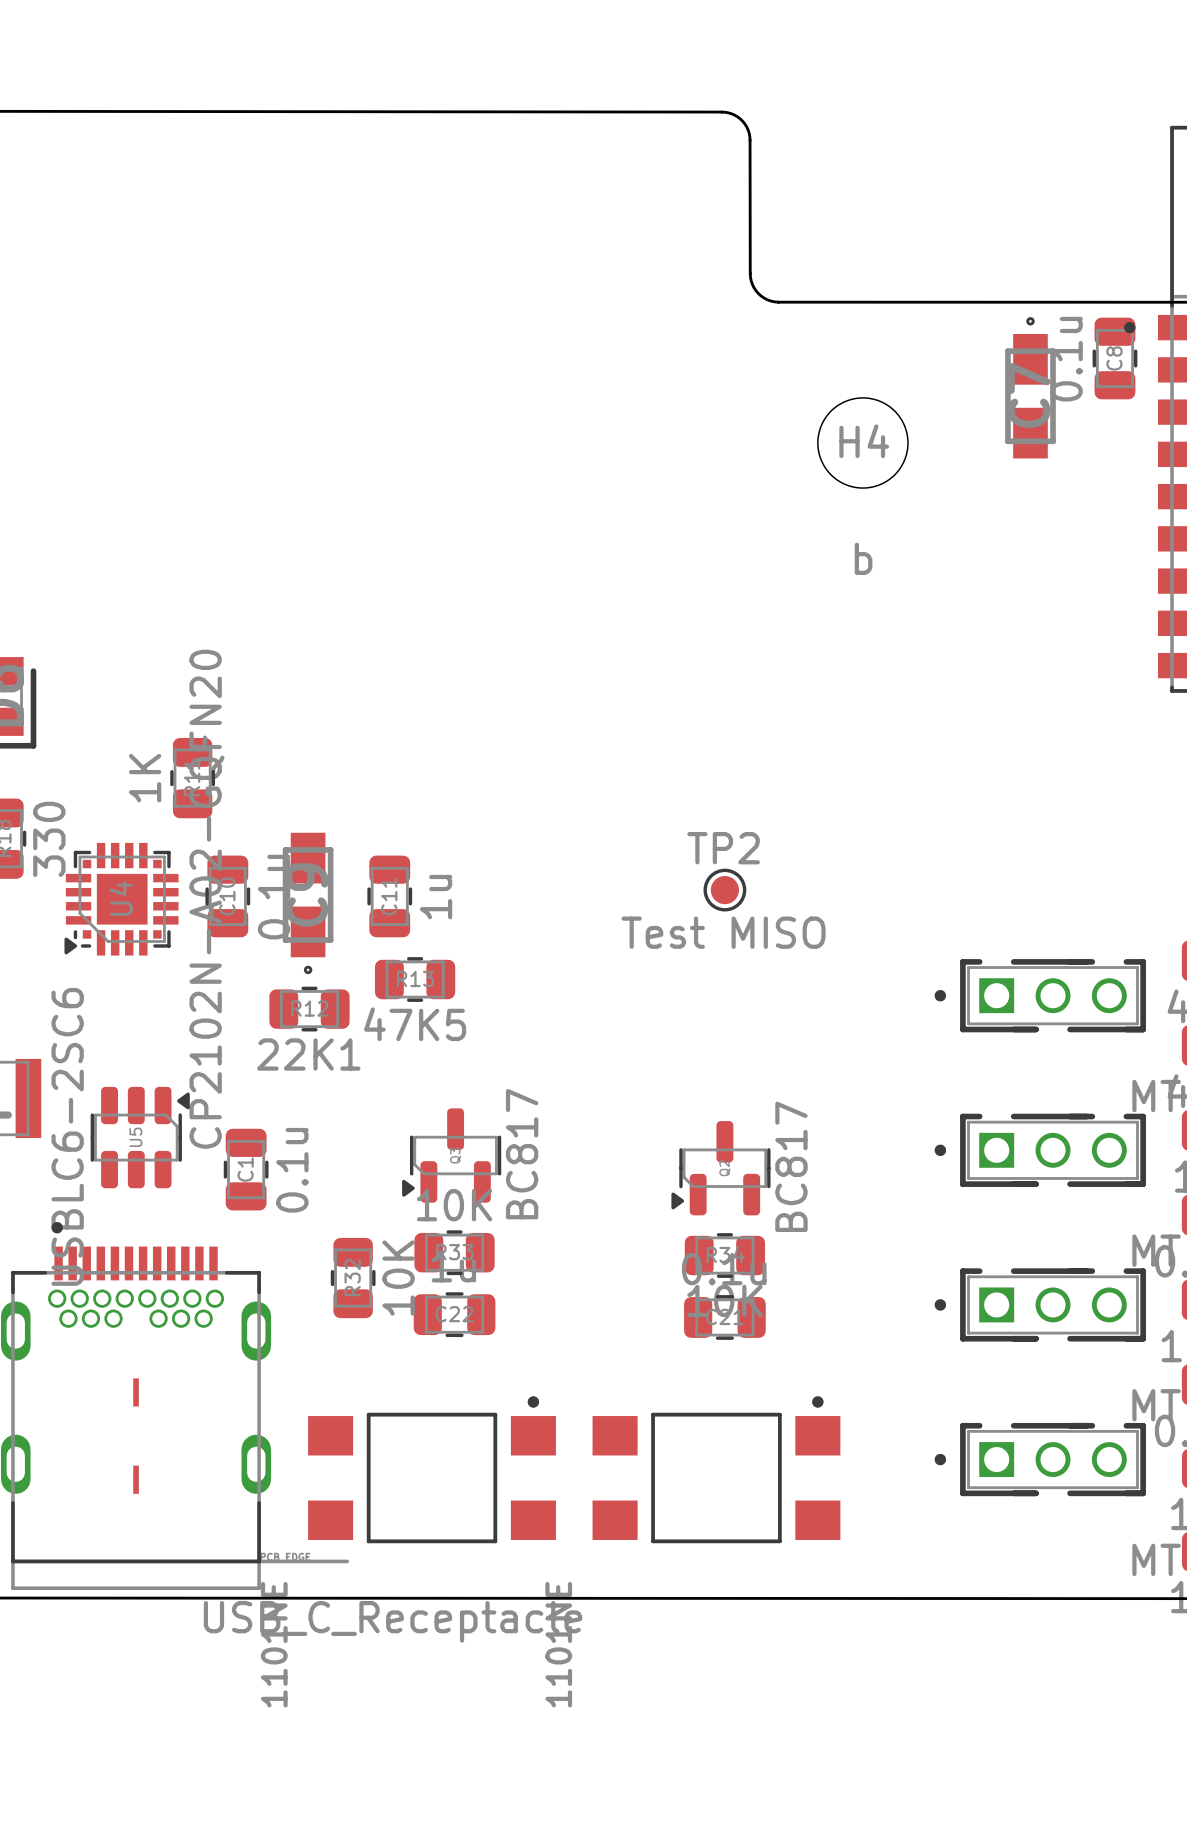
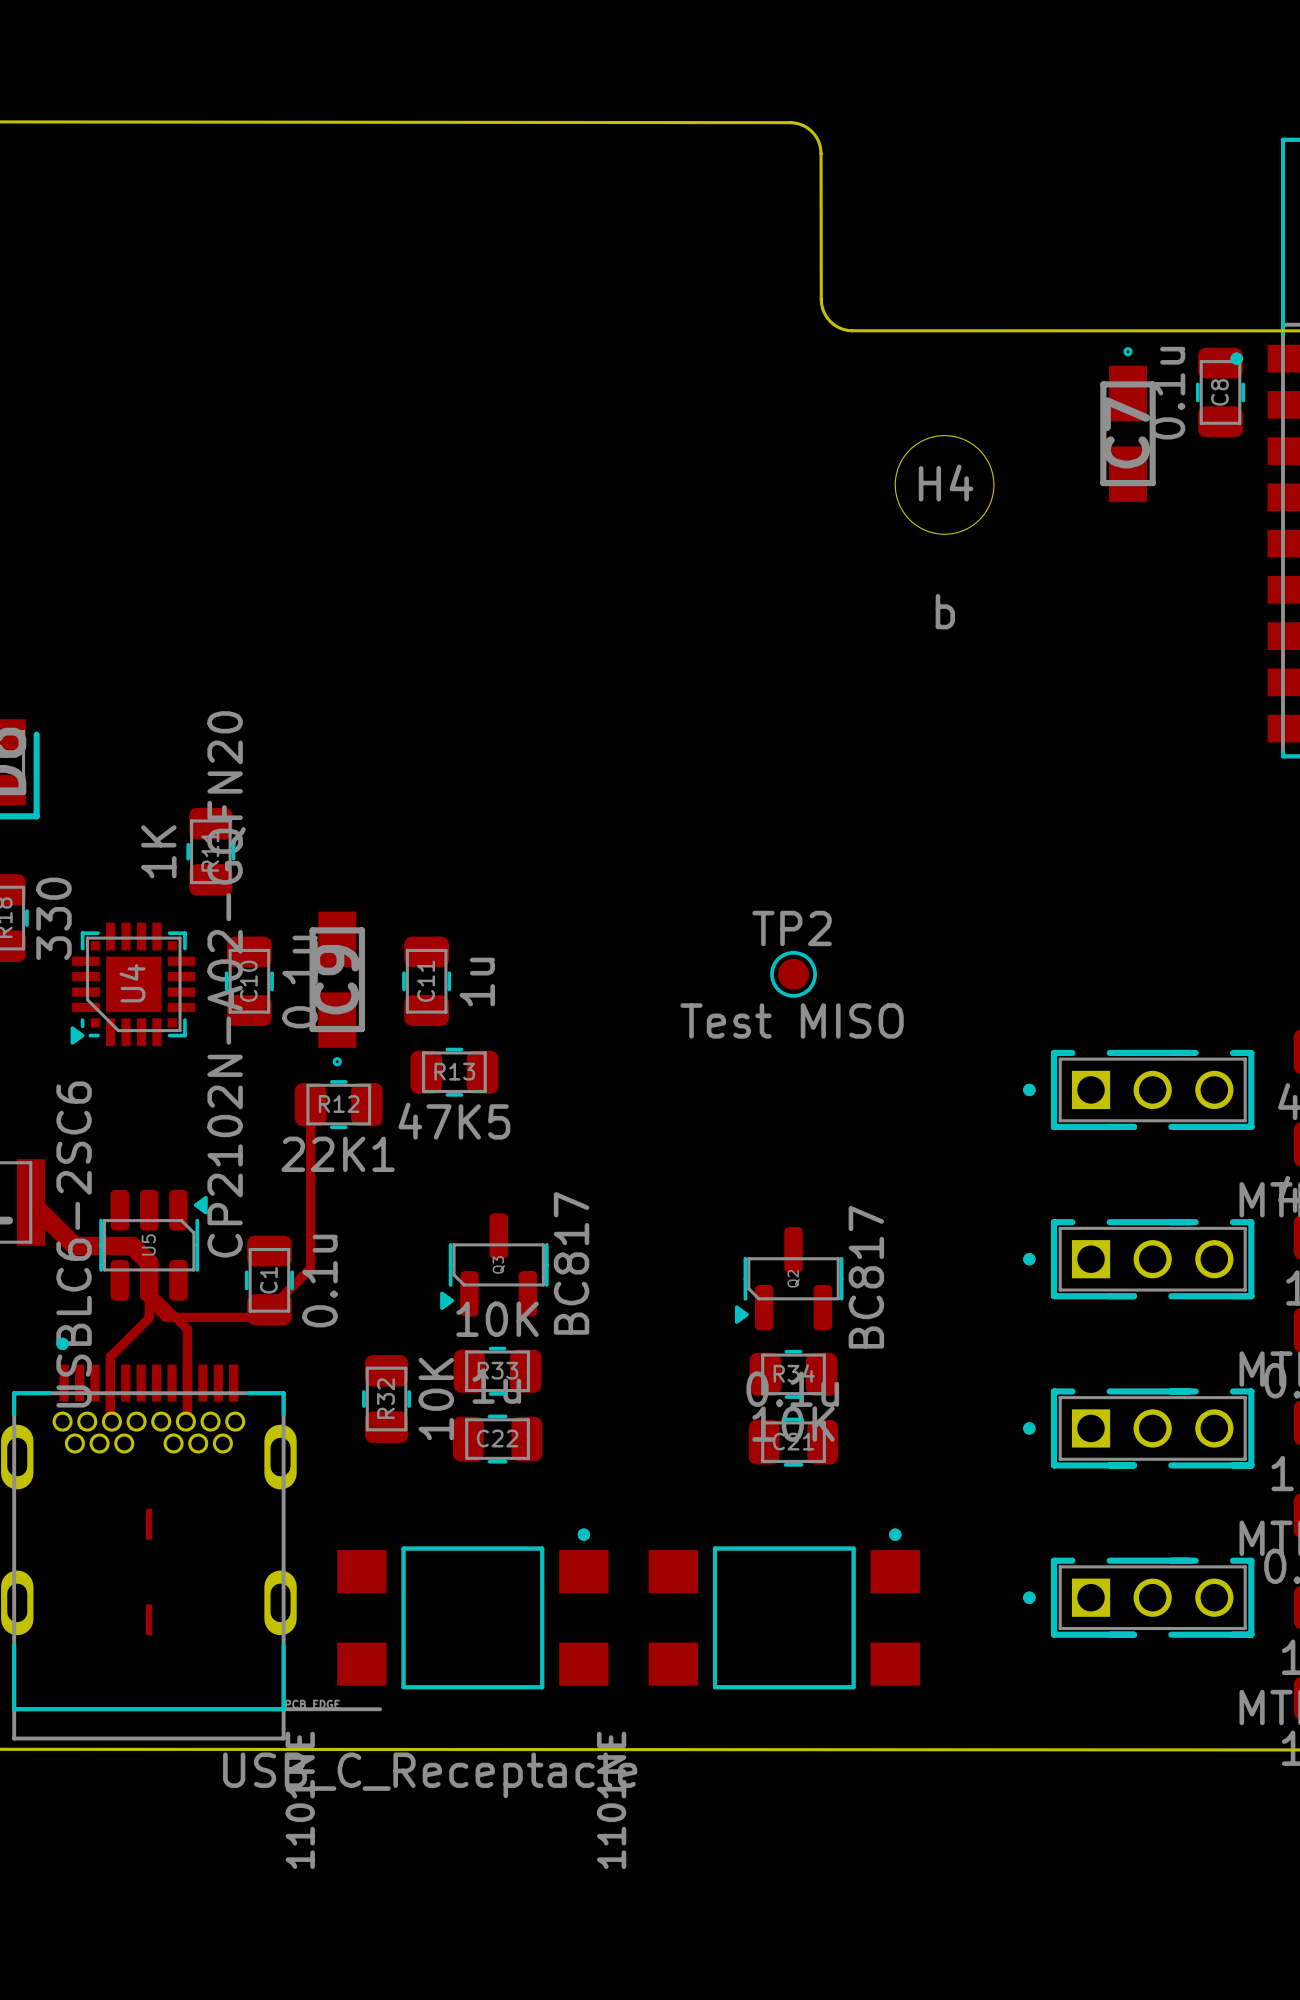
top track: none -> (310, 1104) (310, 1268) (261, 1317) (165, 1317) (149, 1300)
top track: none -> (31, 1202) (74, 1246) (132, 1246) (149, 1262) (149, 1318) (110, 1356) (110, 1420) (111, 1421)
top track: none -> (149, 1291) (187, 1329) (187, 1420) (185, 1421)

